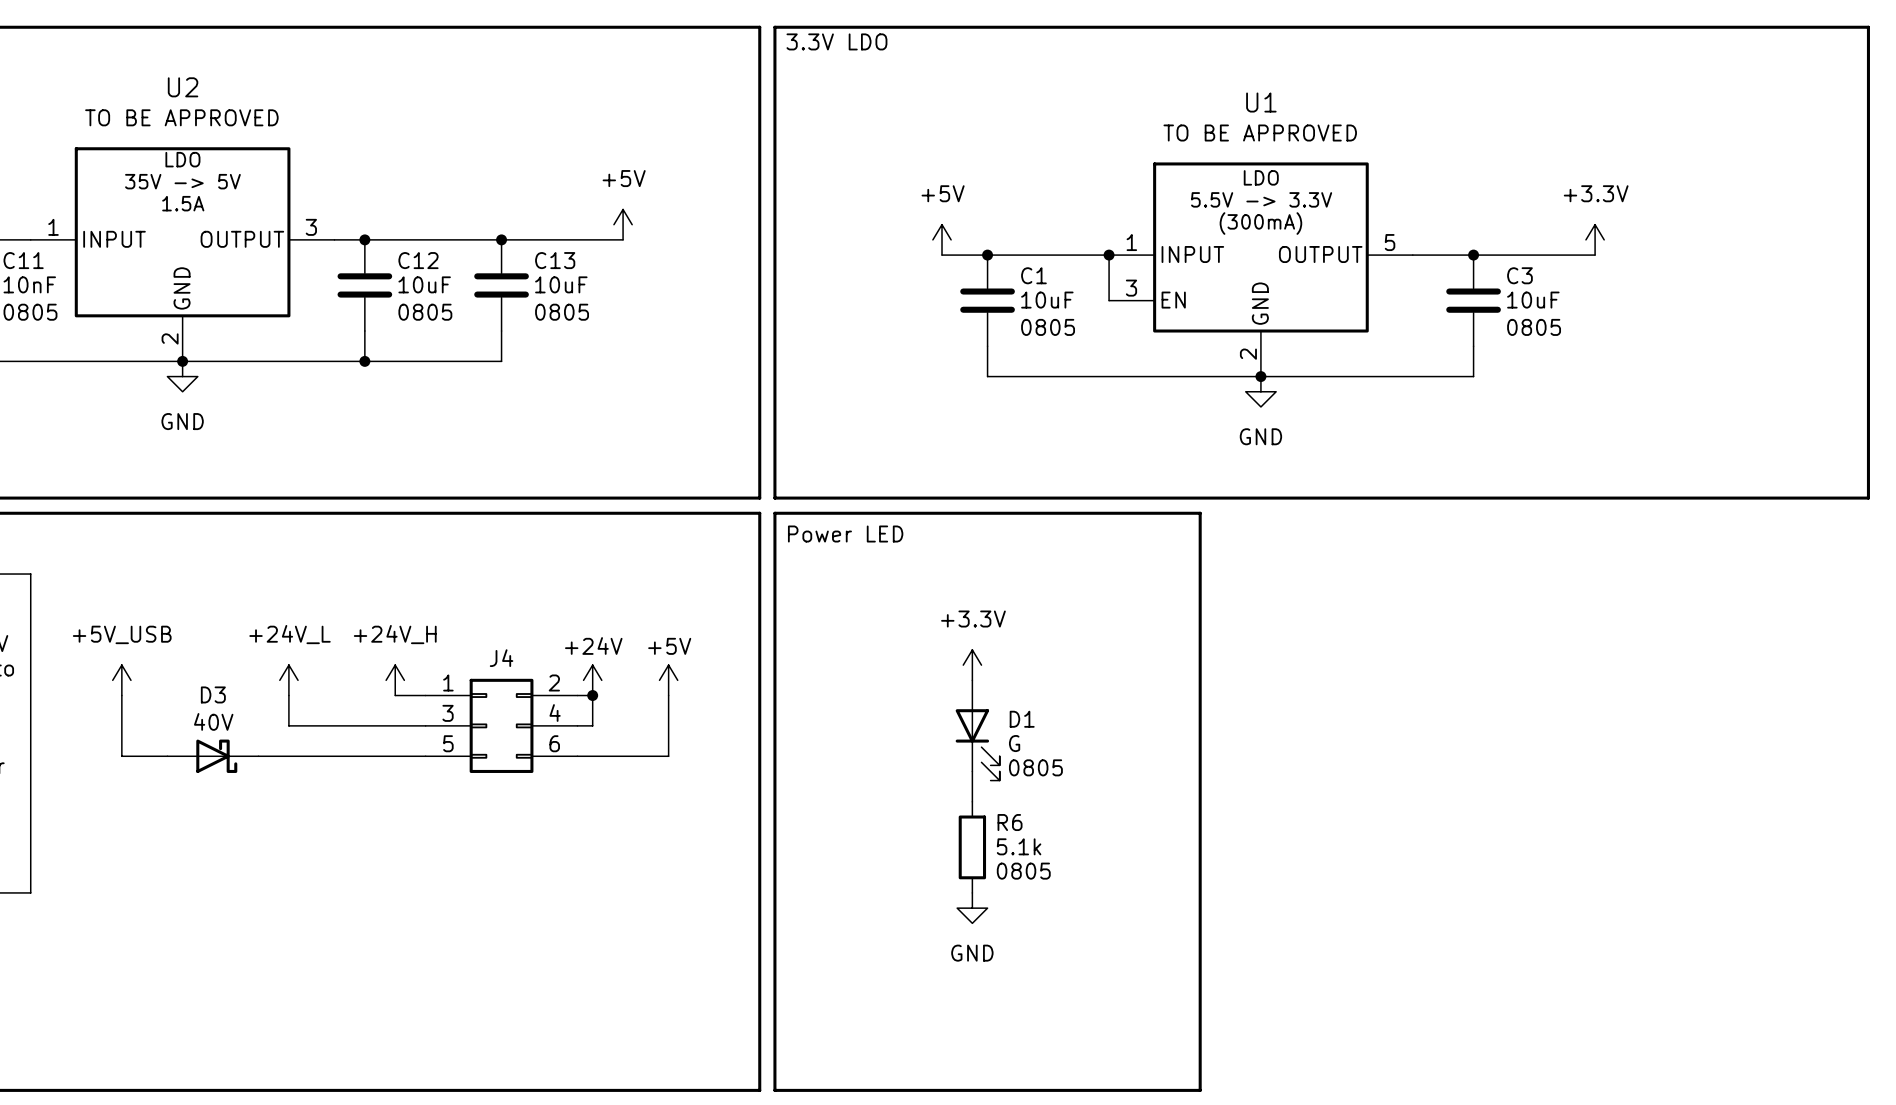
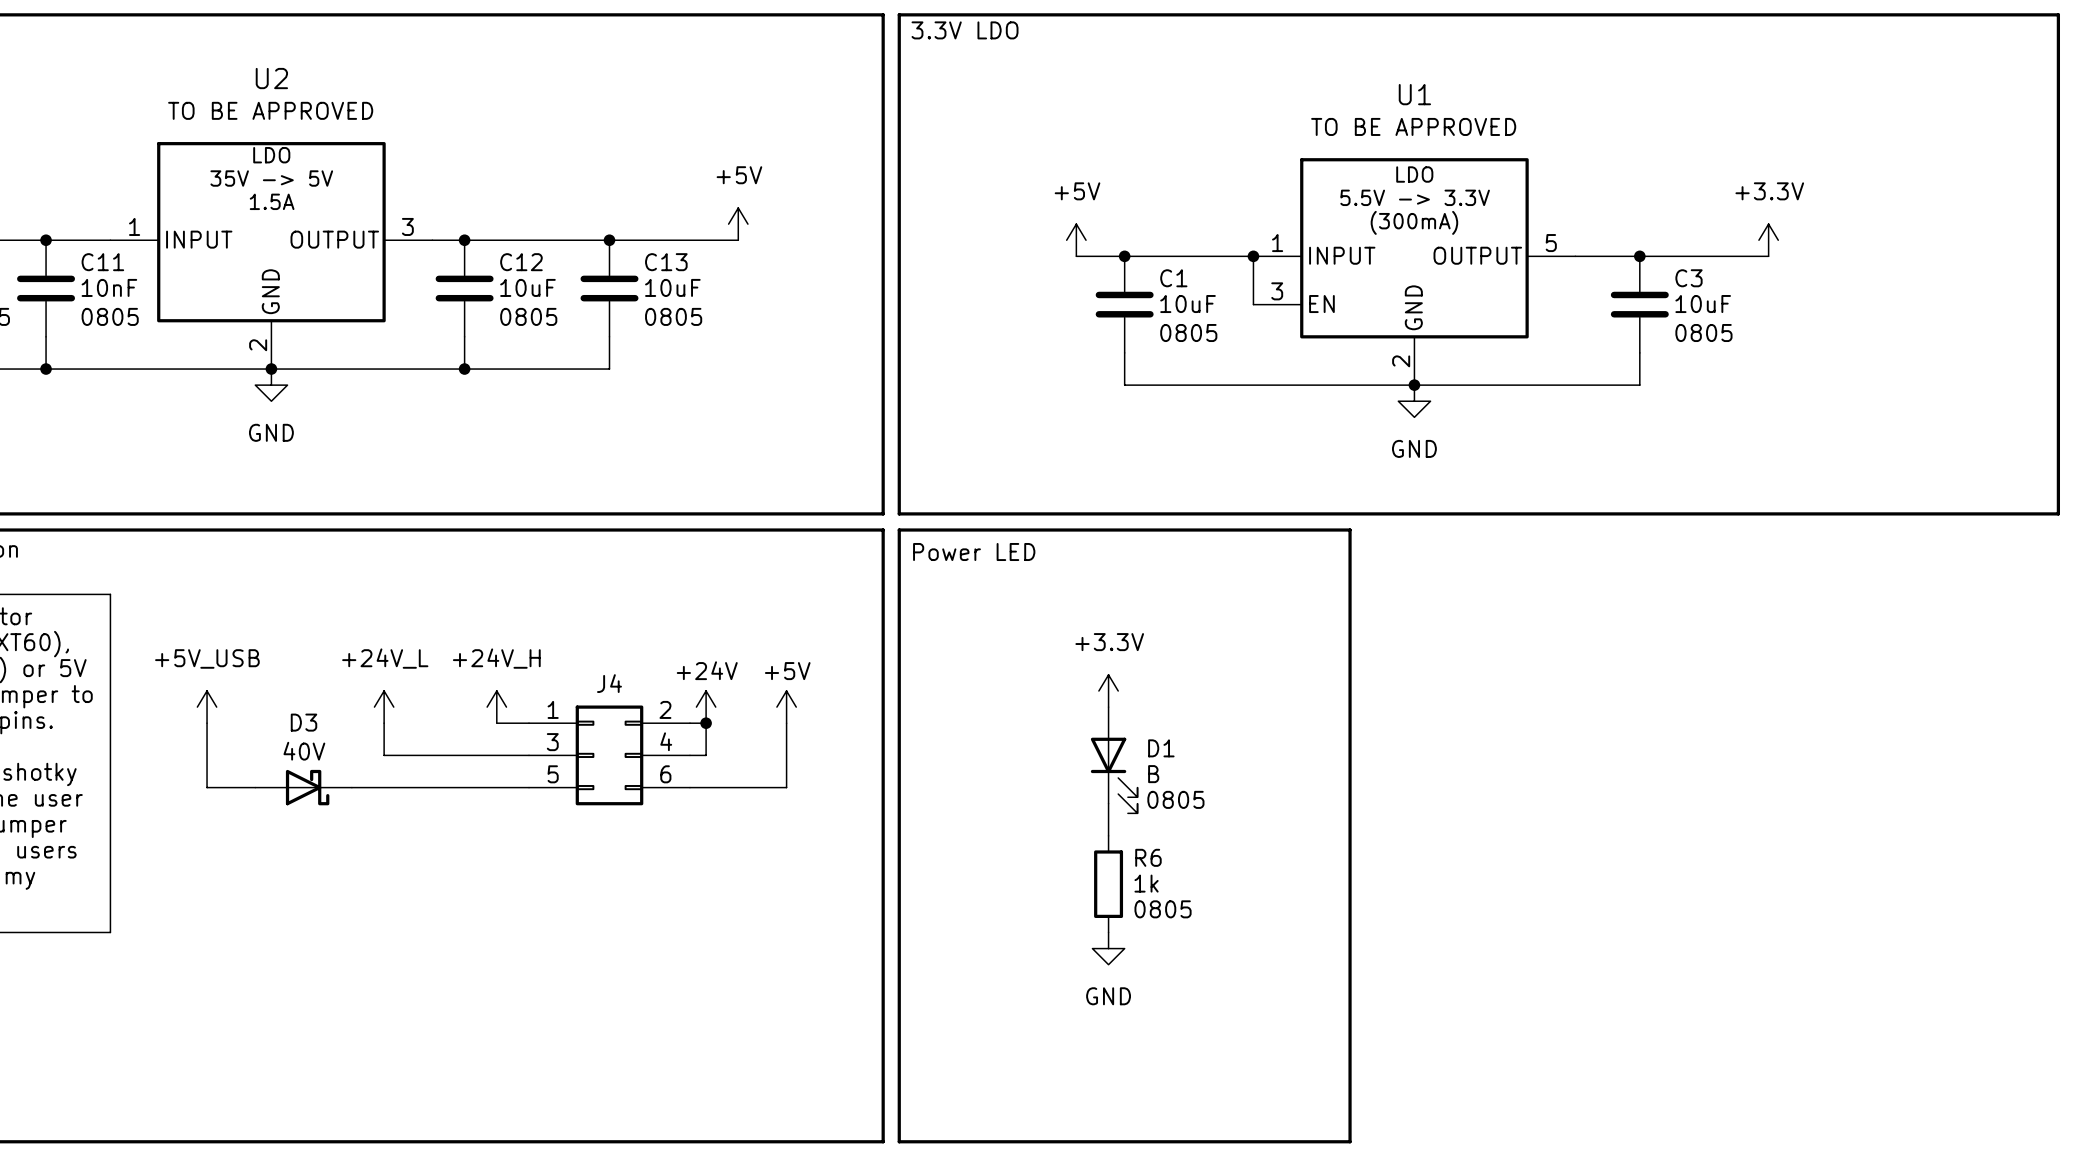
D1 value: G (1014, 743) -> B (1153, 774)
R6 value: 5.1k (1019, 846) -> 1k (1146, 883)

